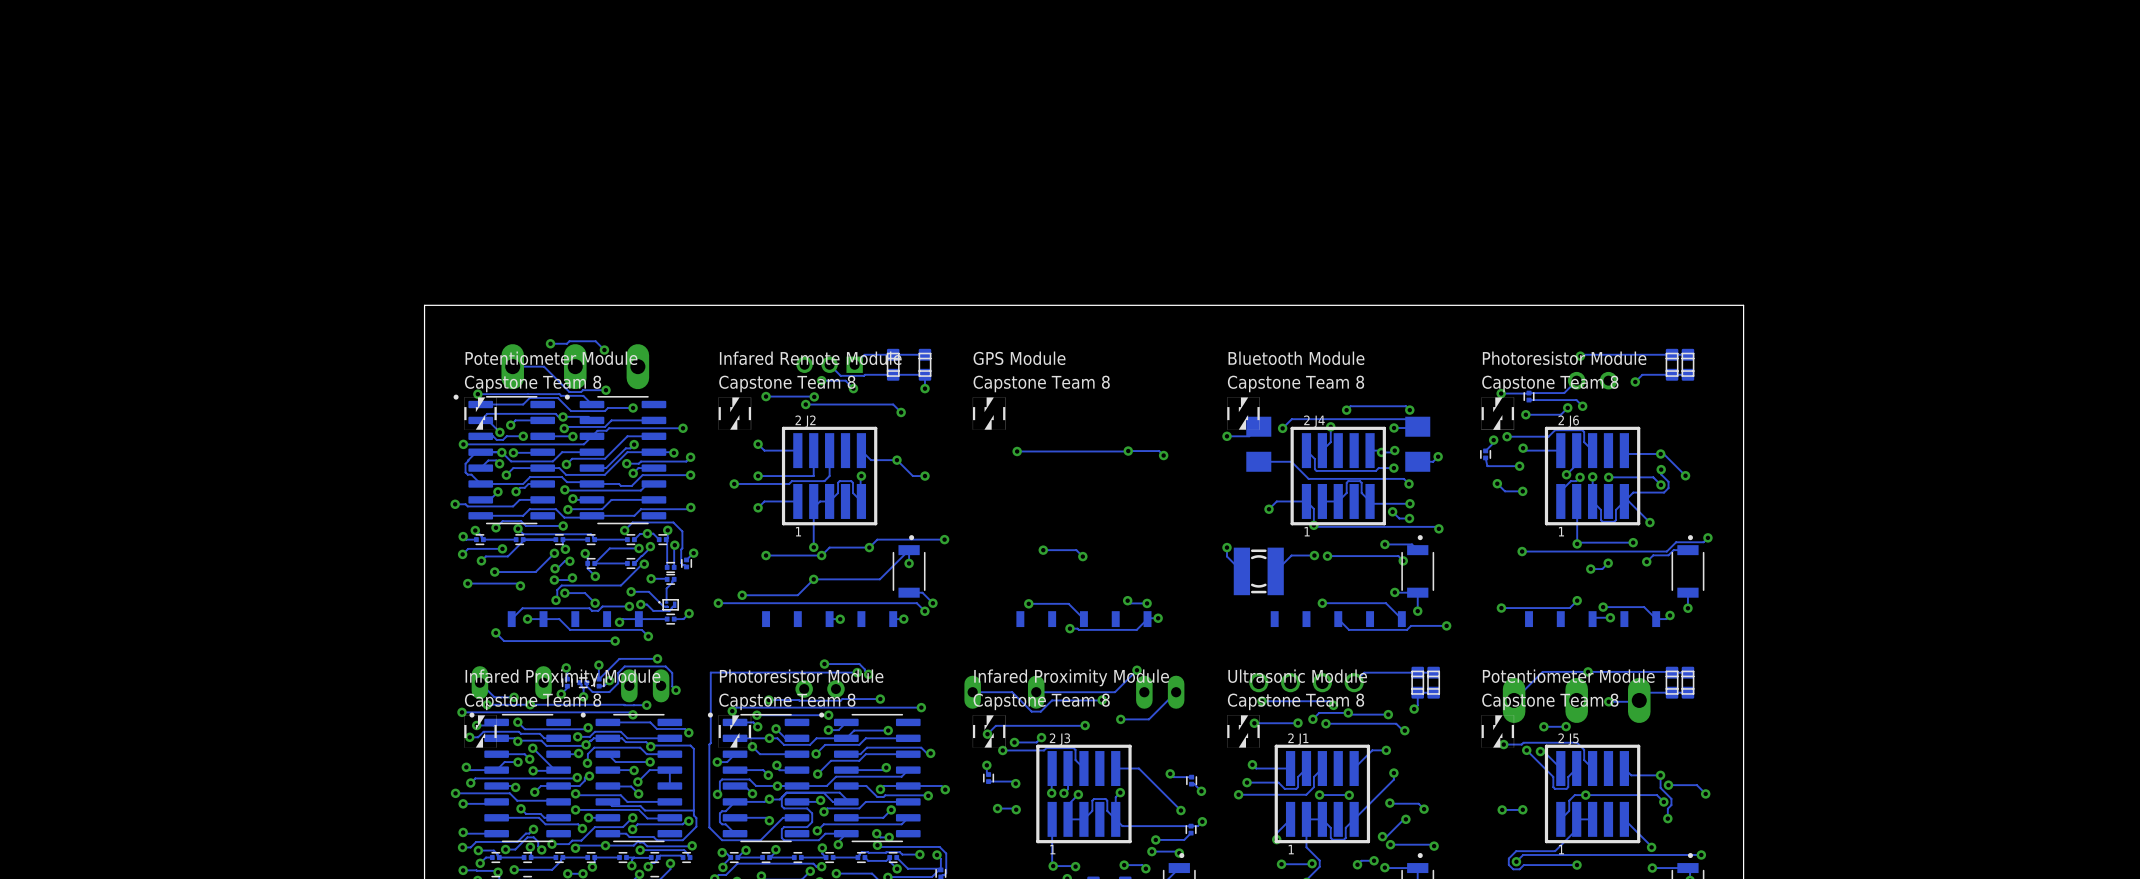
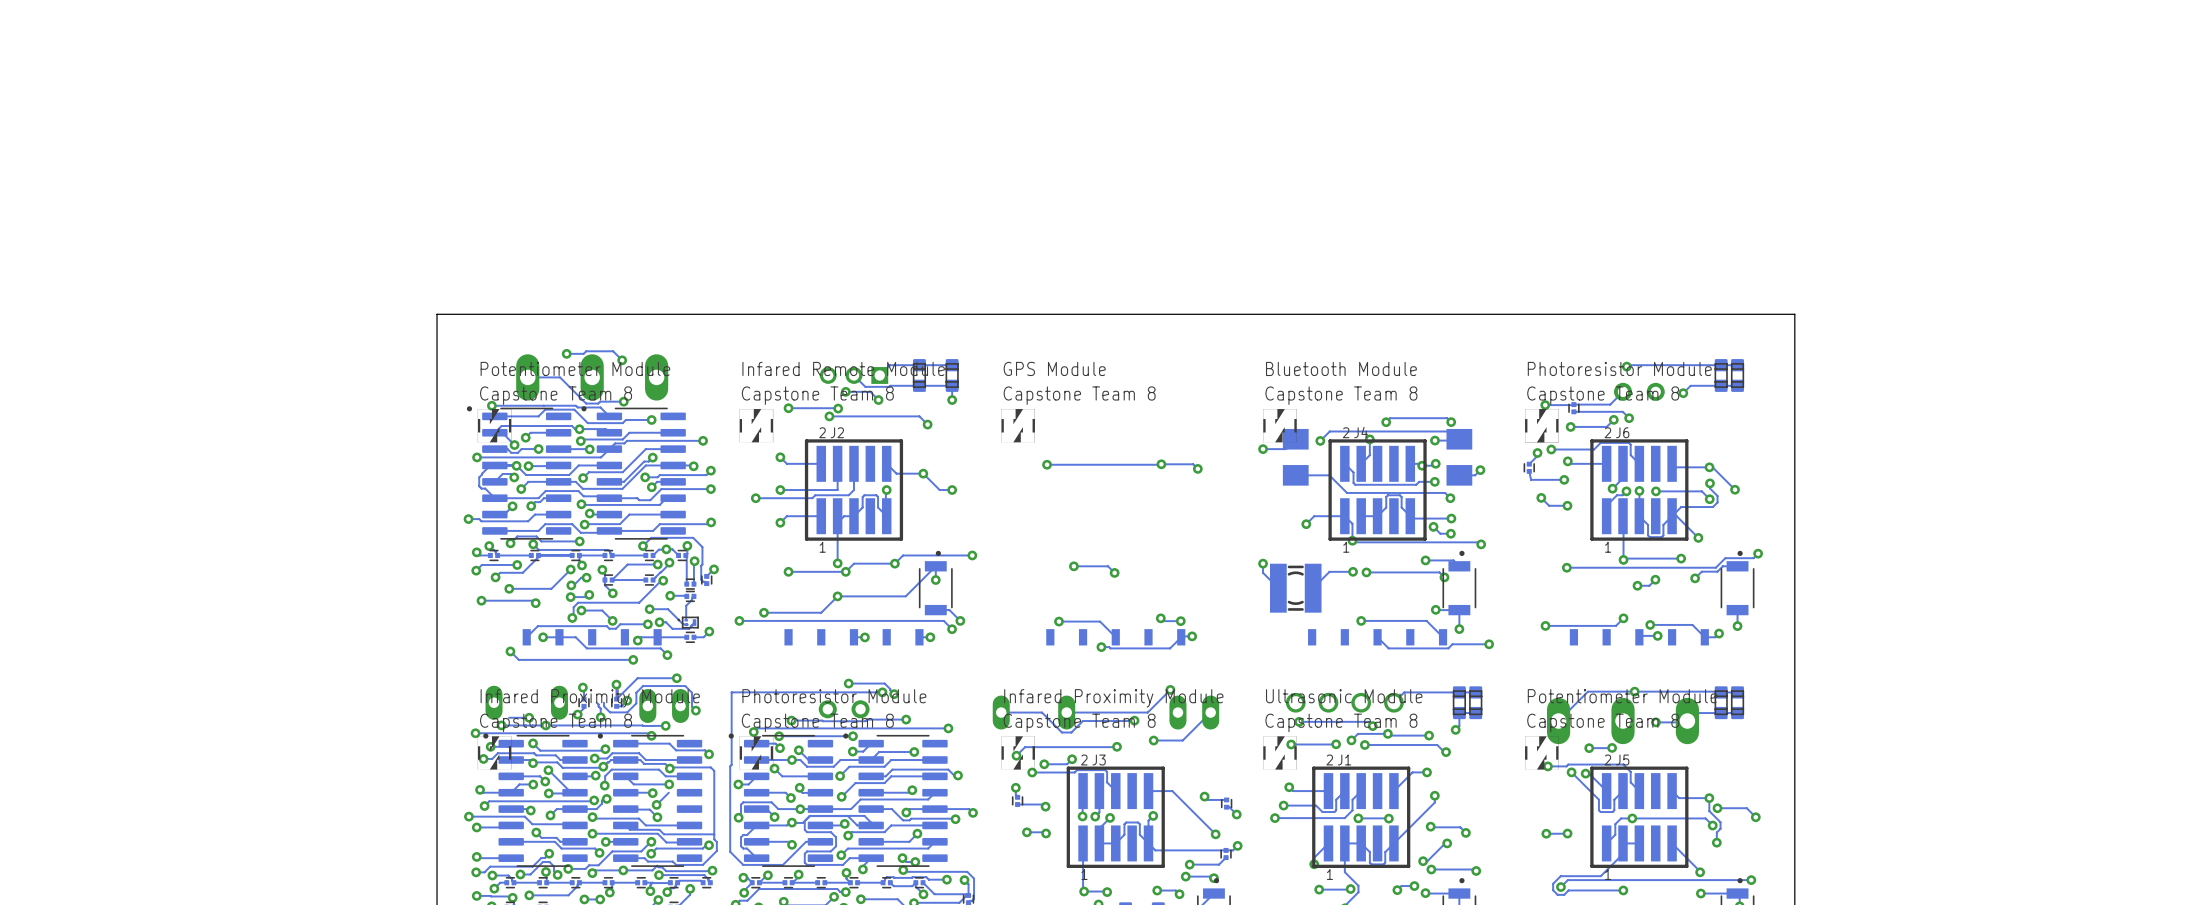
track: (479, 682) (494, 697) -> none
part: (583, 682) -> none
track: (649, 770) (669, 770) (669, 786) -> none

